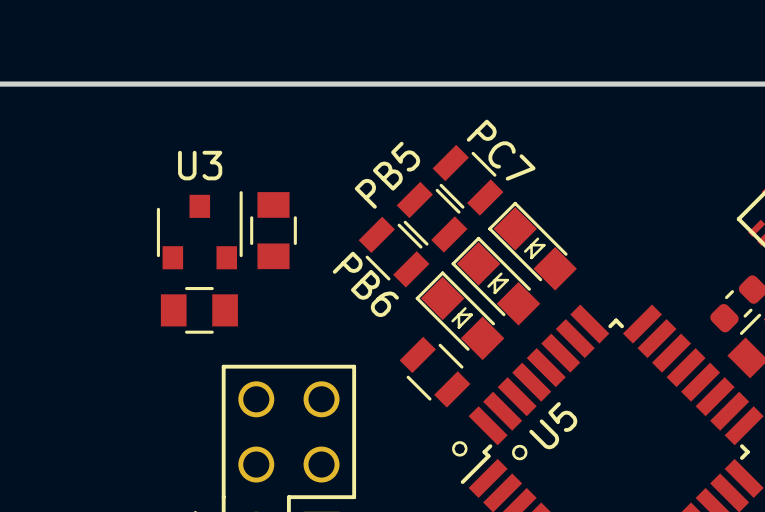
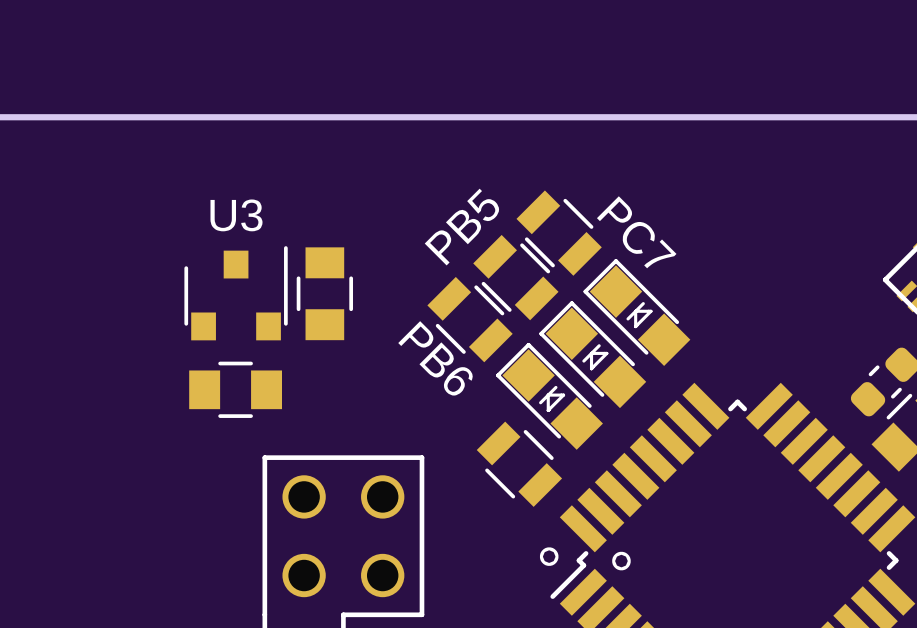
PC7 name position: PC7 (501, 150) -> PC7 (636, 232)
U5 name: U5 (553, 425) -> none

